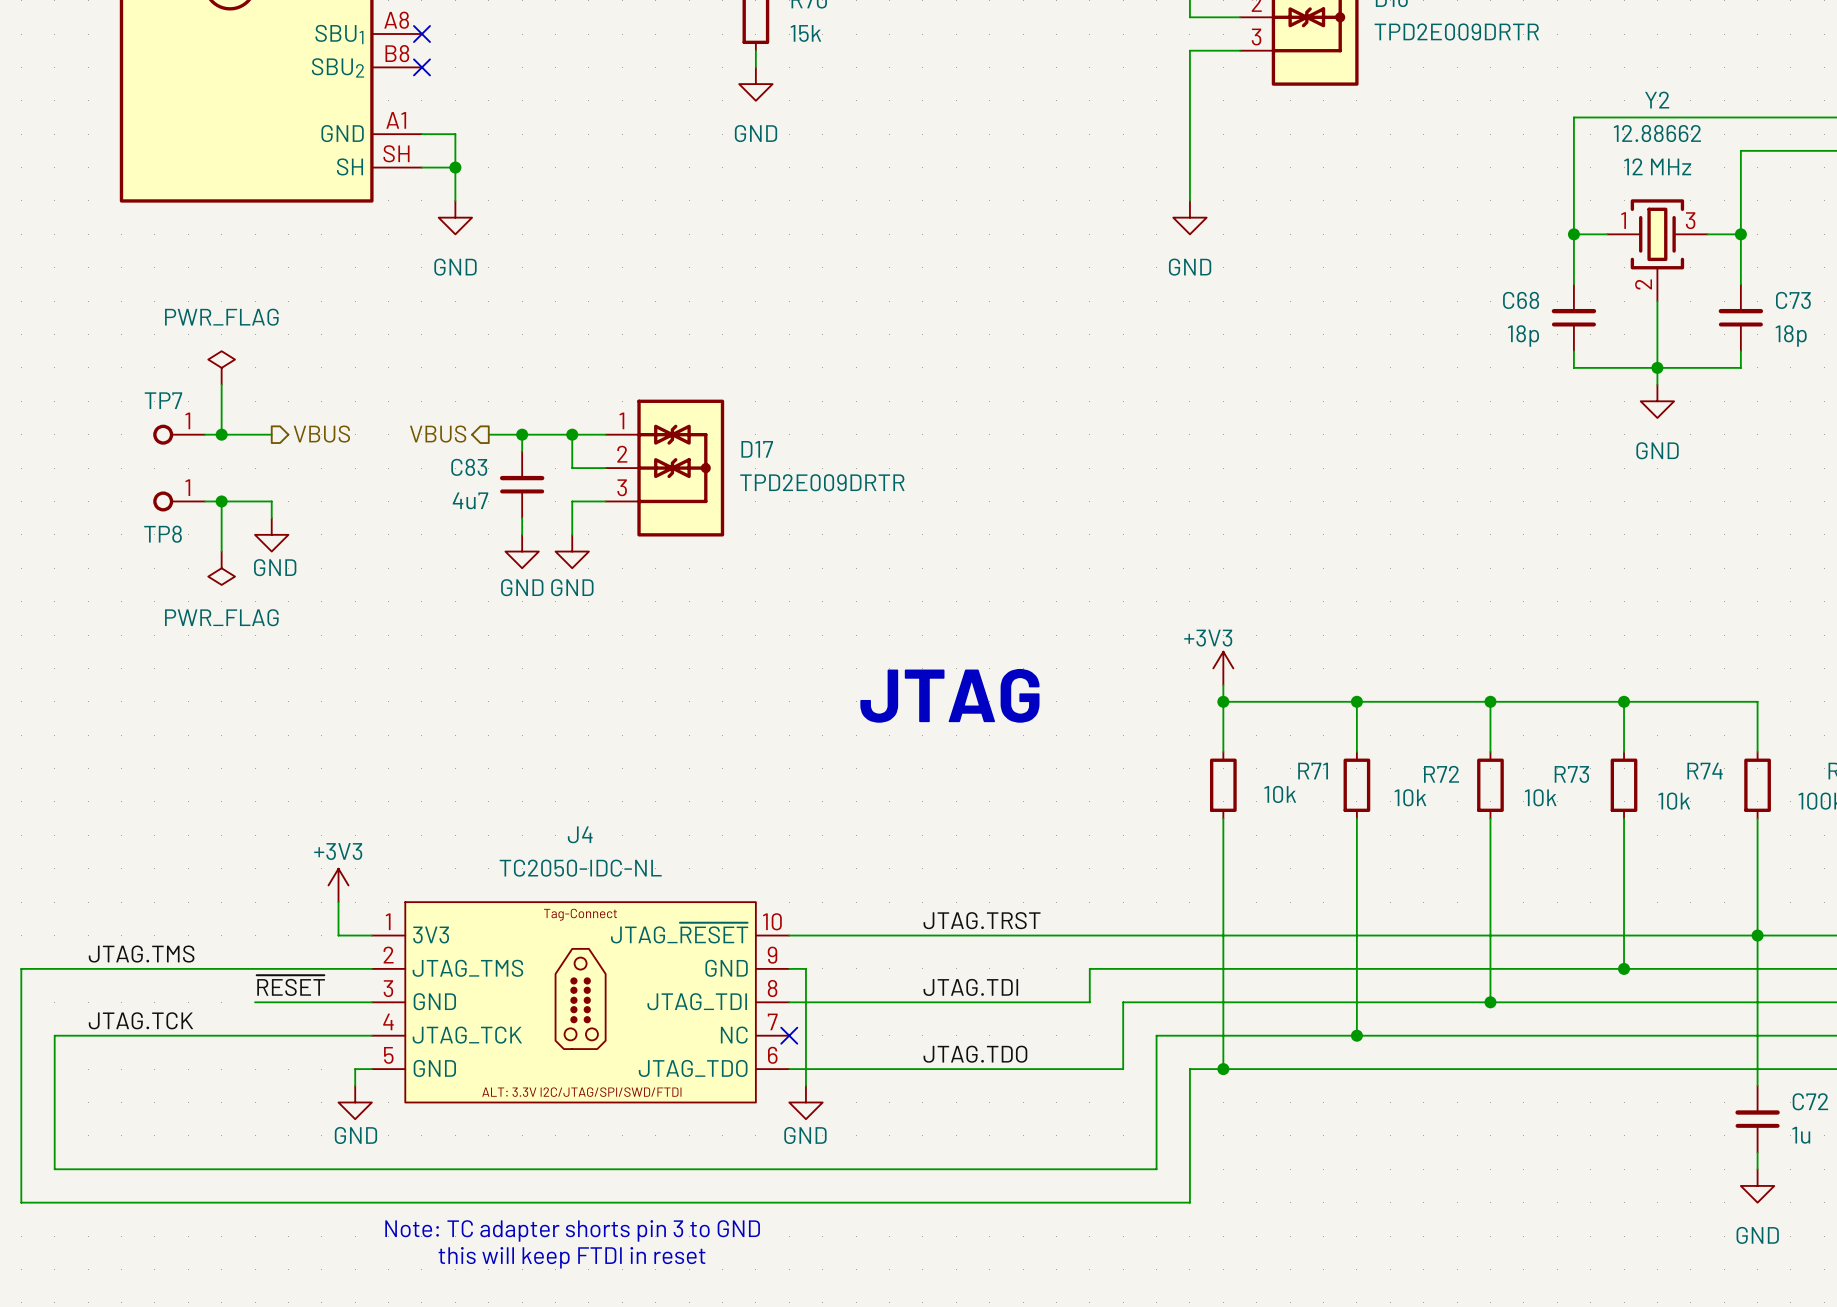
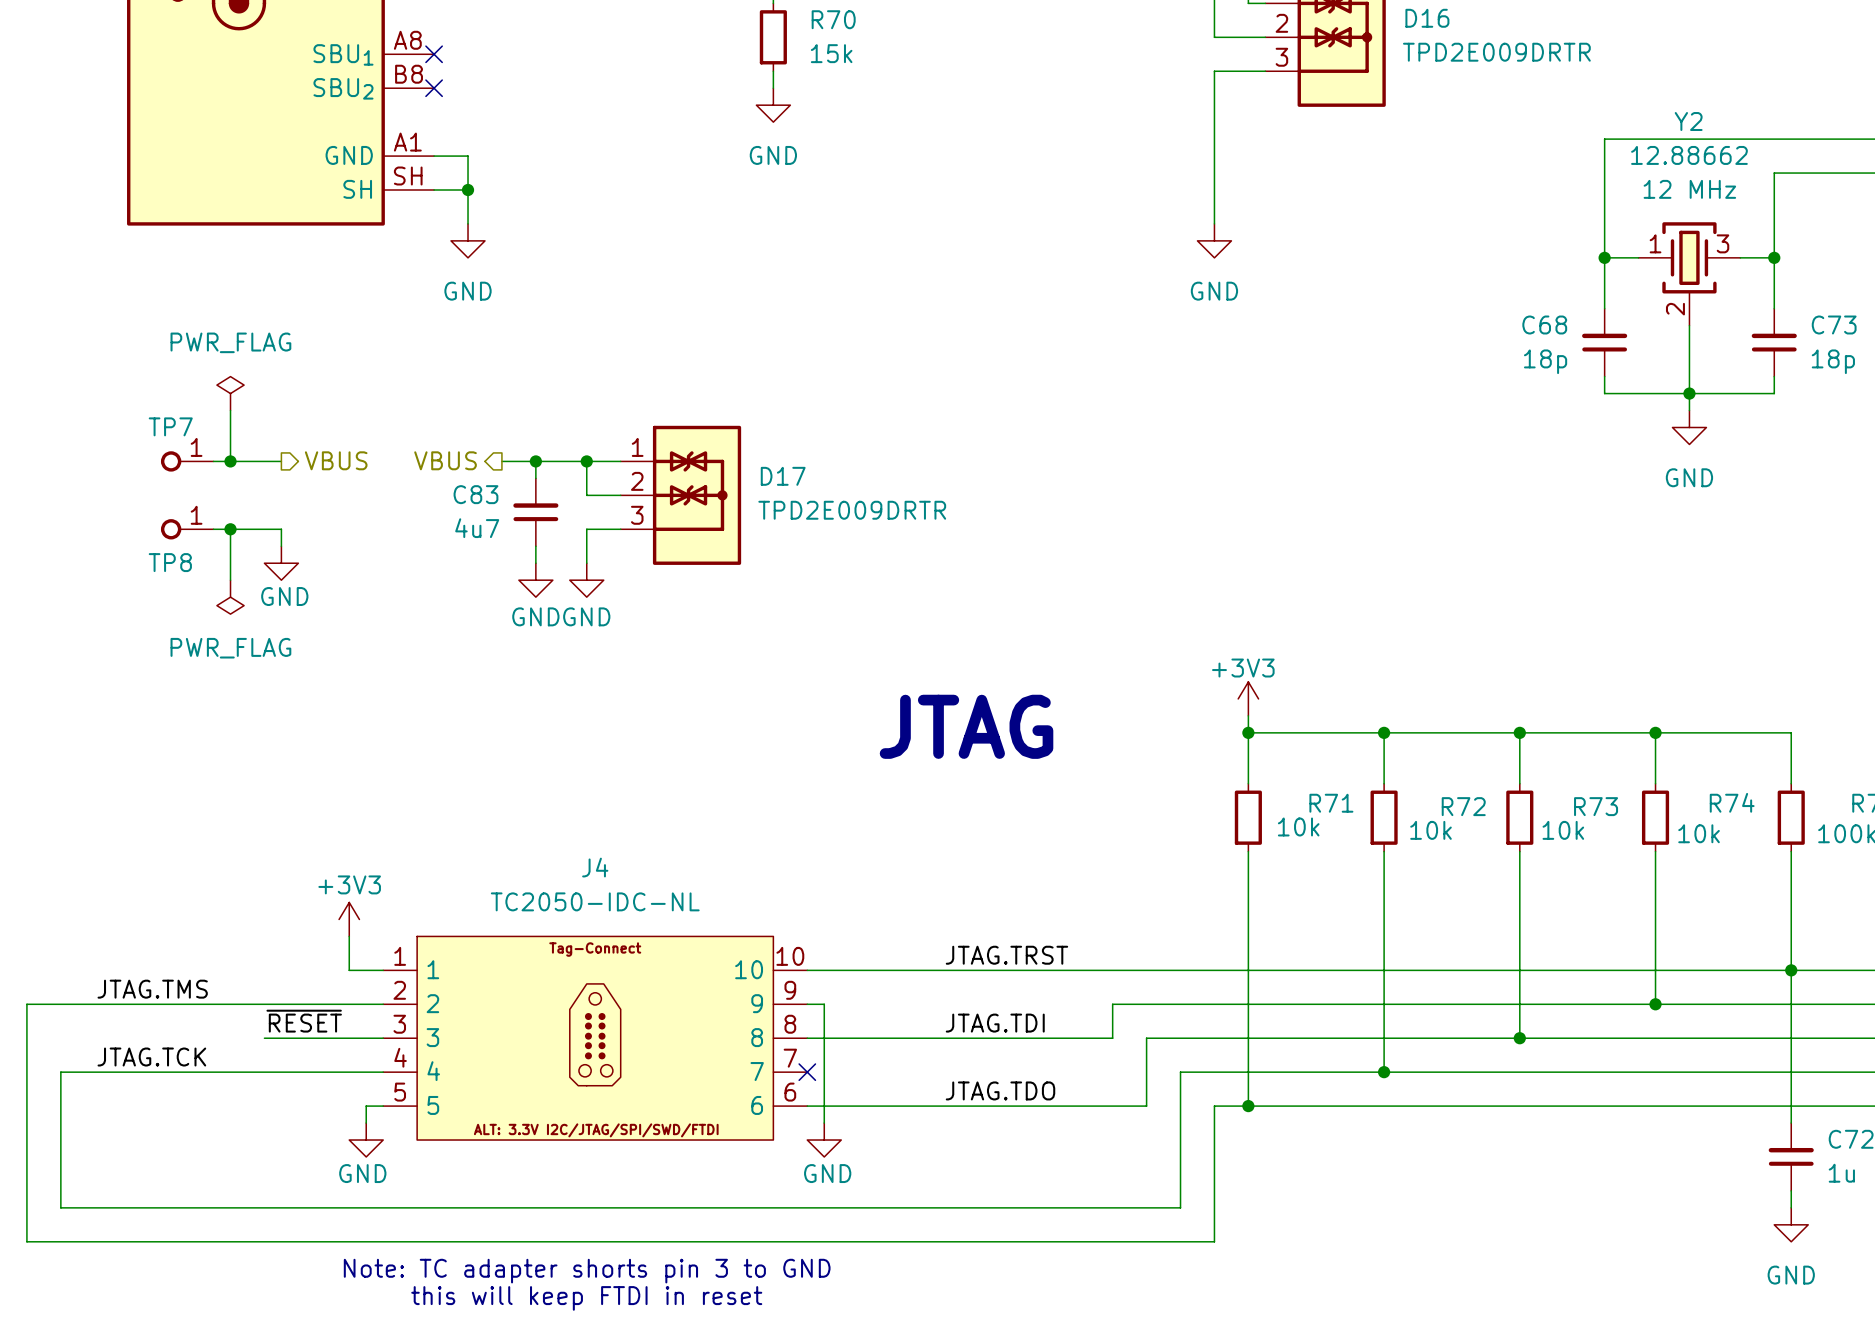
J4 symbol: [371, 902, 790, 1103] -> [383, 936, 808, 1141]

